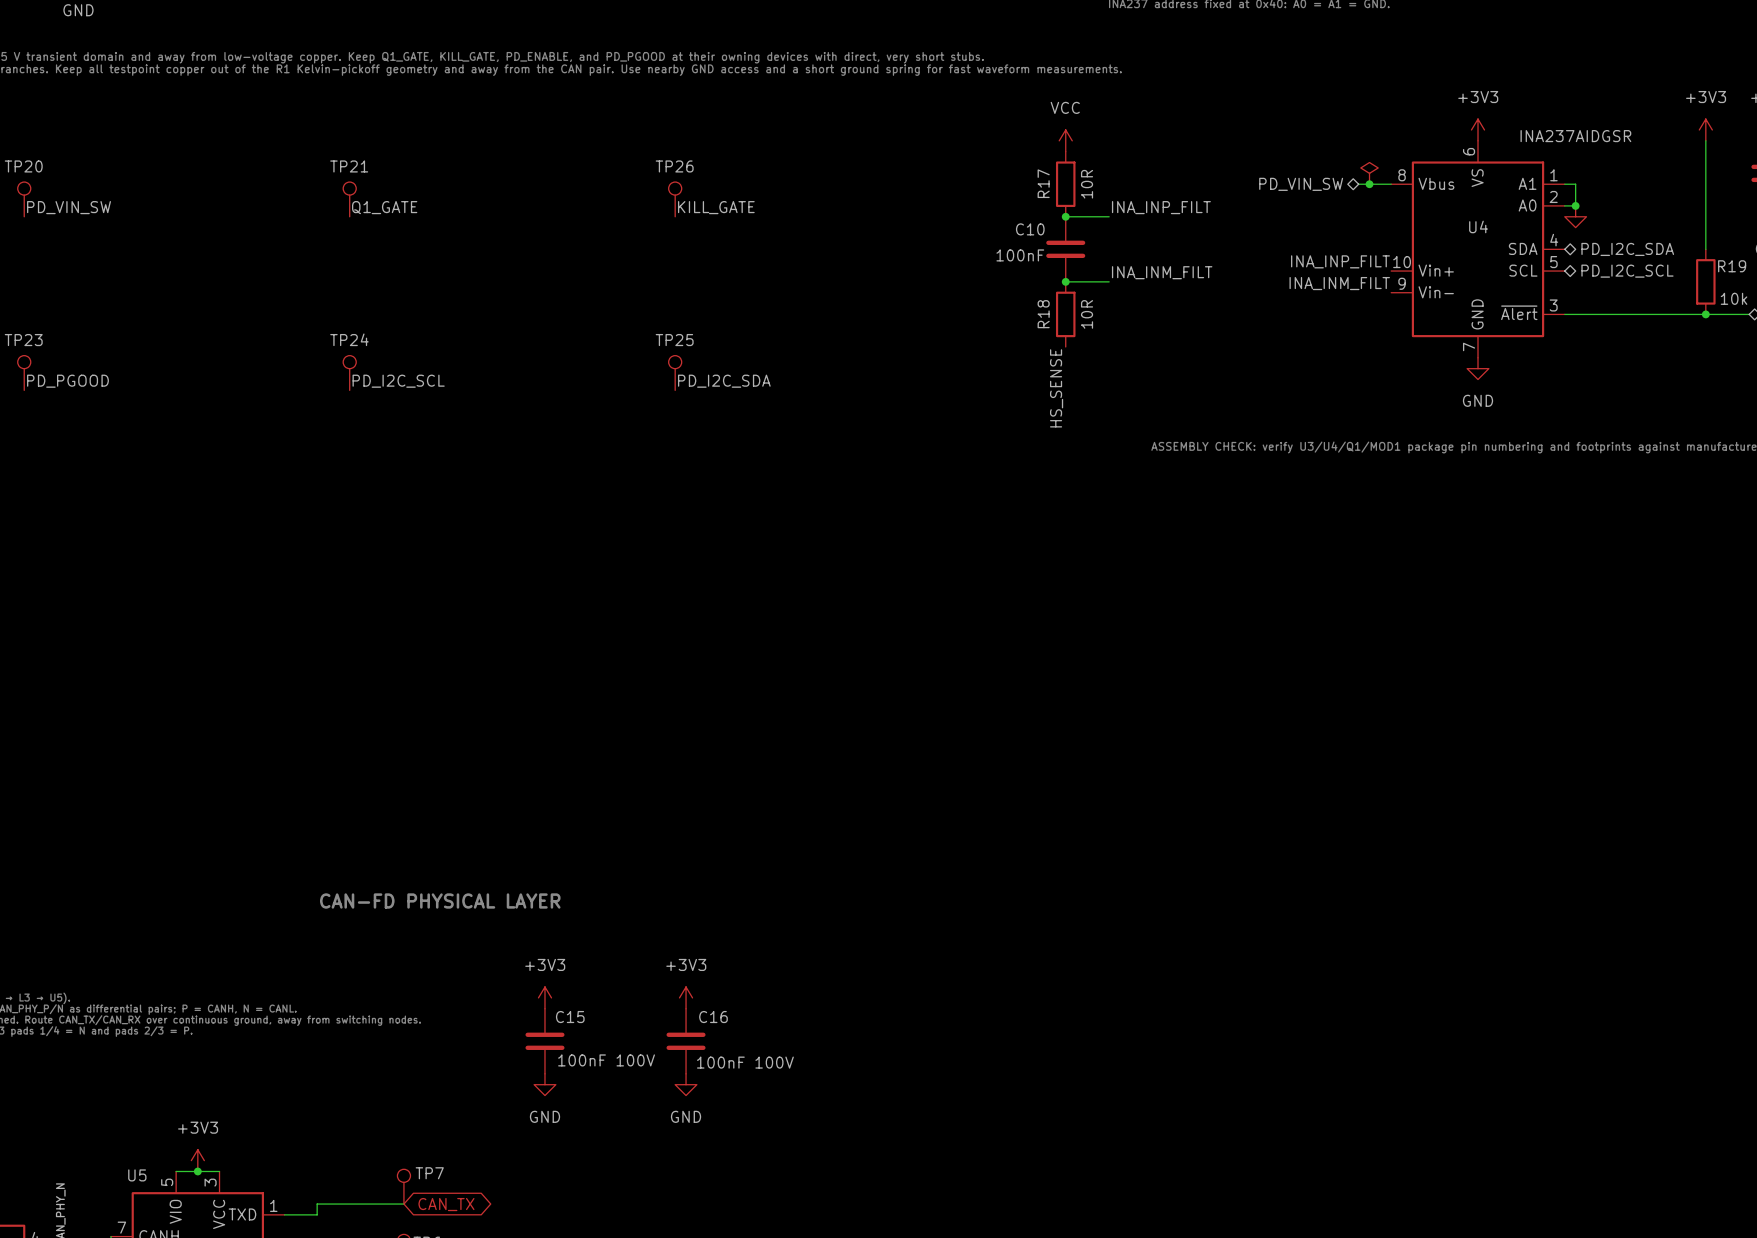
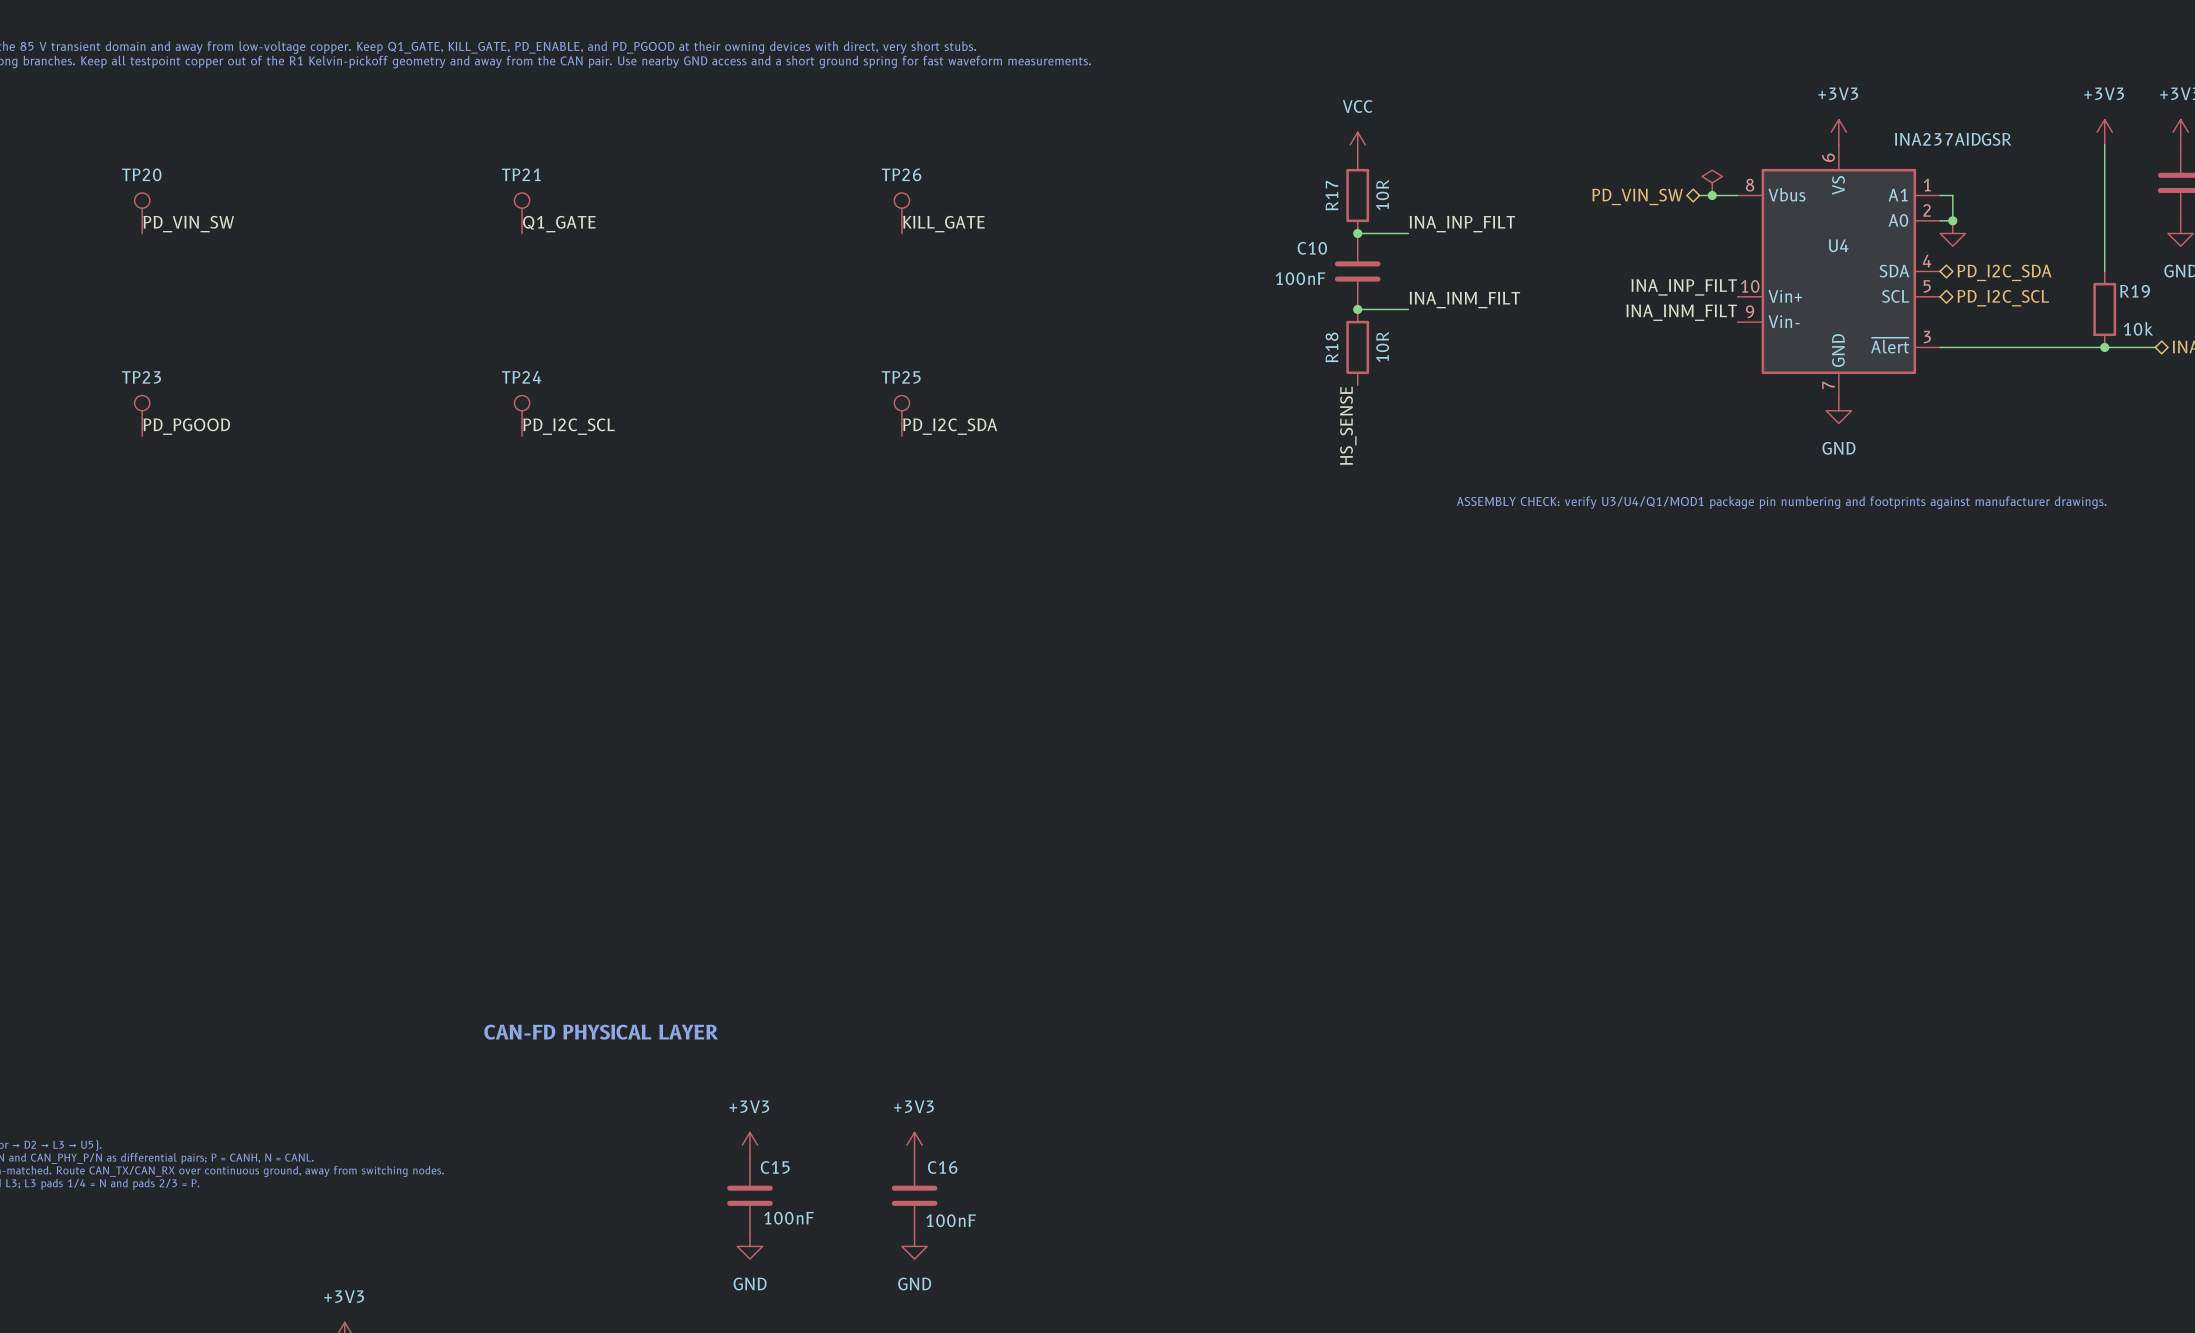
C15 value: 100nF 100V (606, 1060) -> 100nF (789, 1218)
C16 value: 100nF 100V (745, 1062) -> 100nF (951, 1220)

